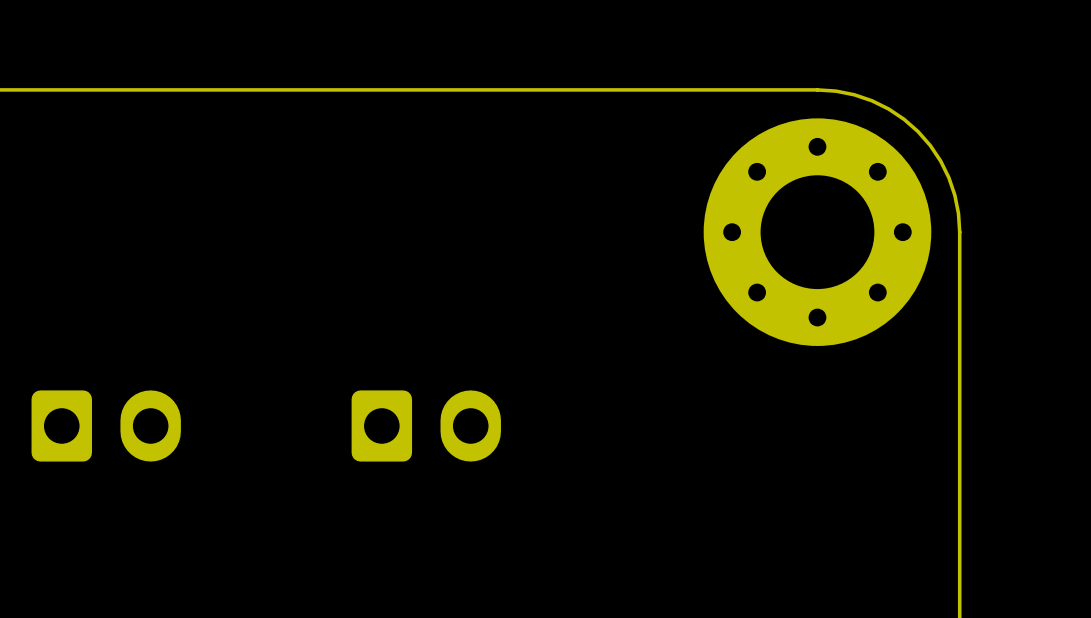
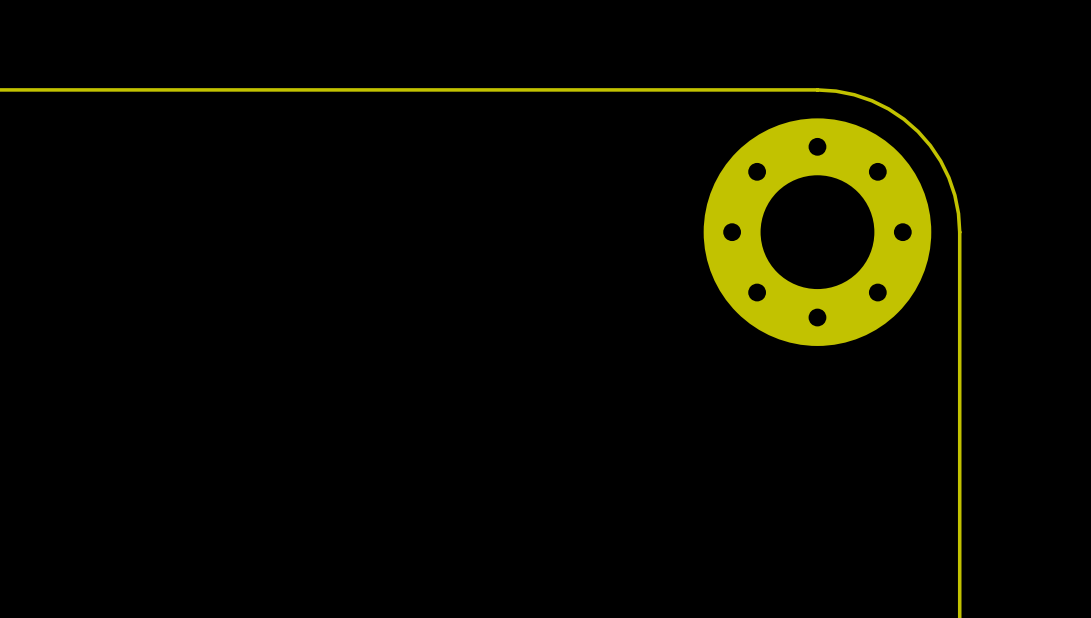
part: (106, 425) -> none
part: (426, 425) -> none

